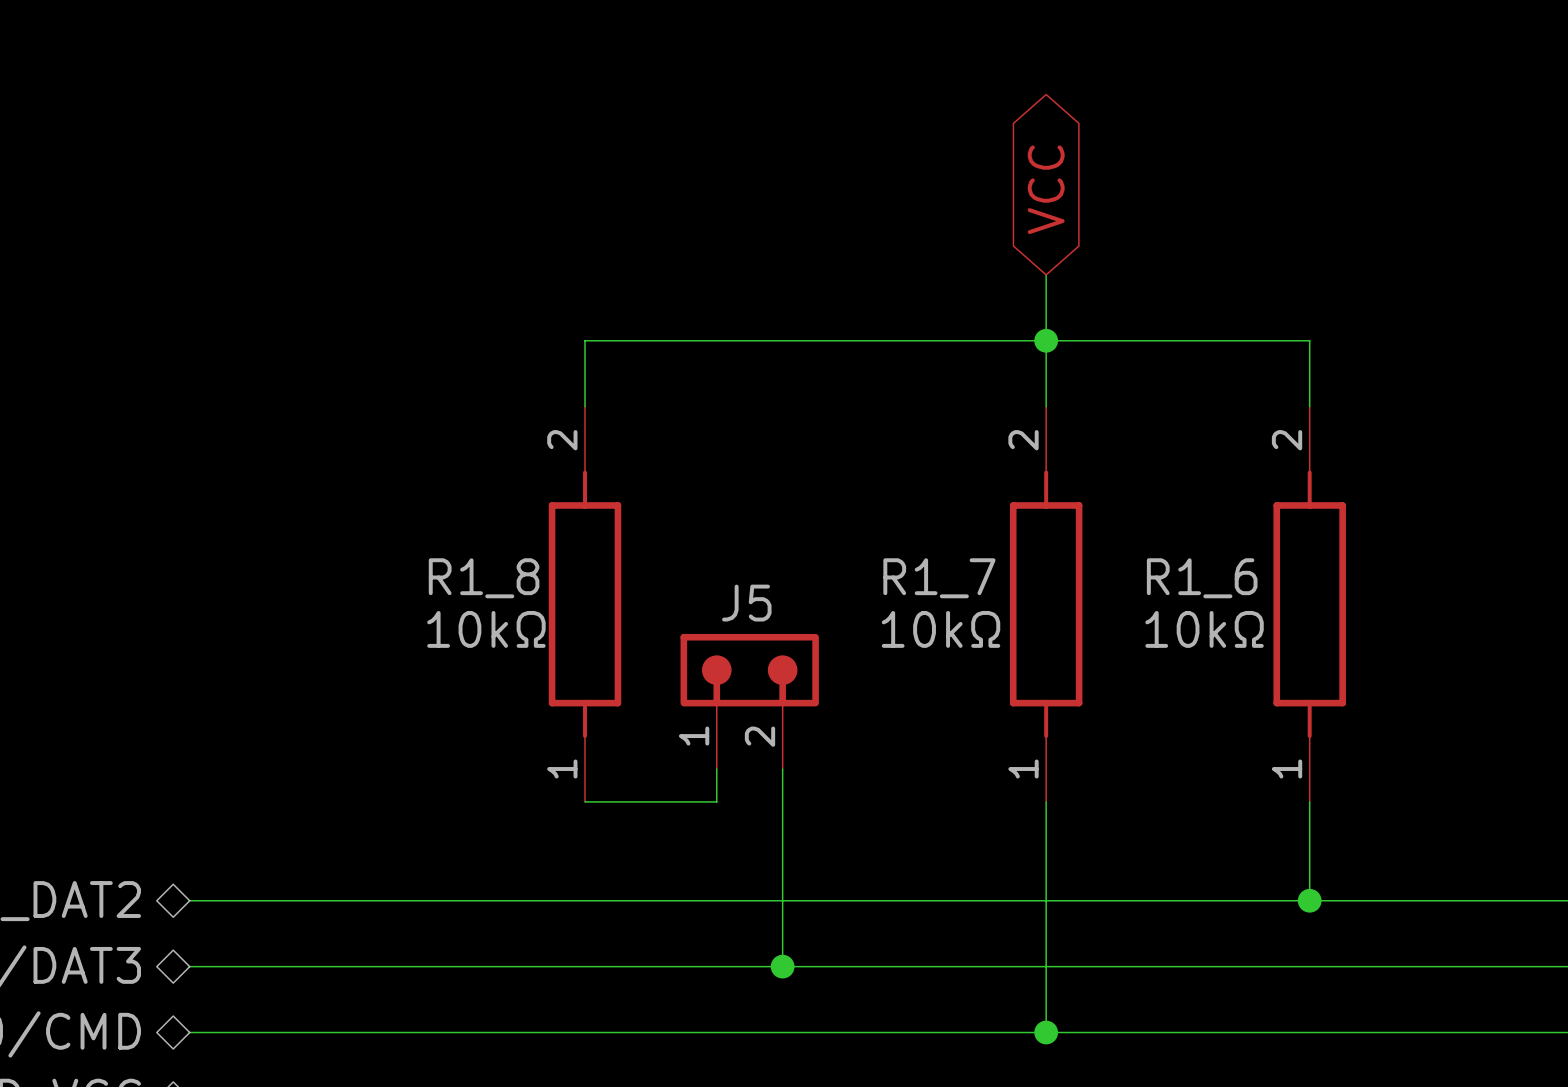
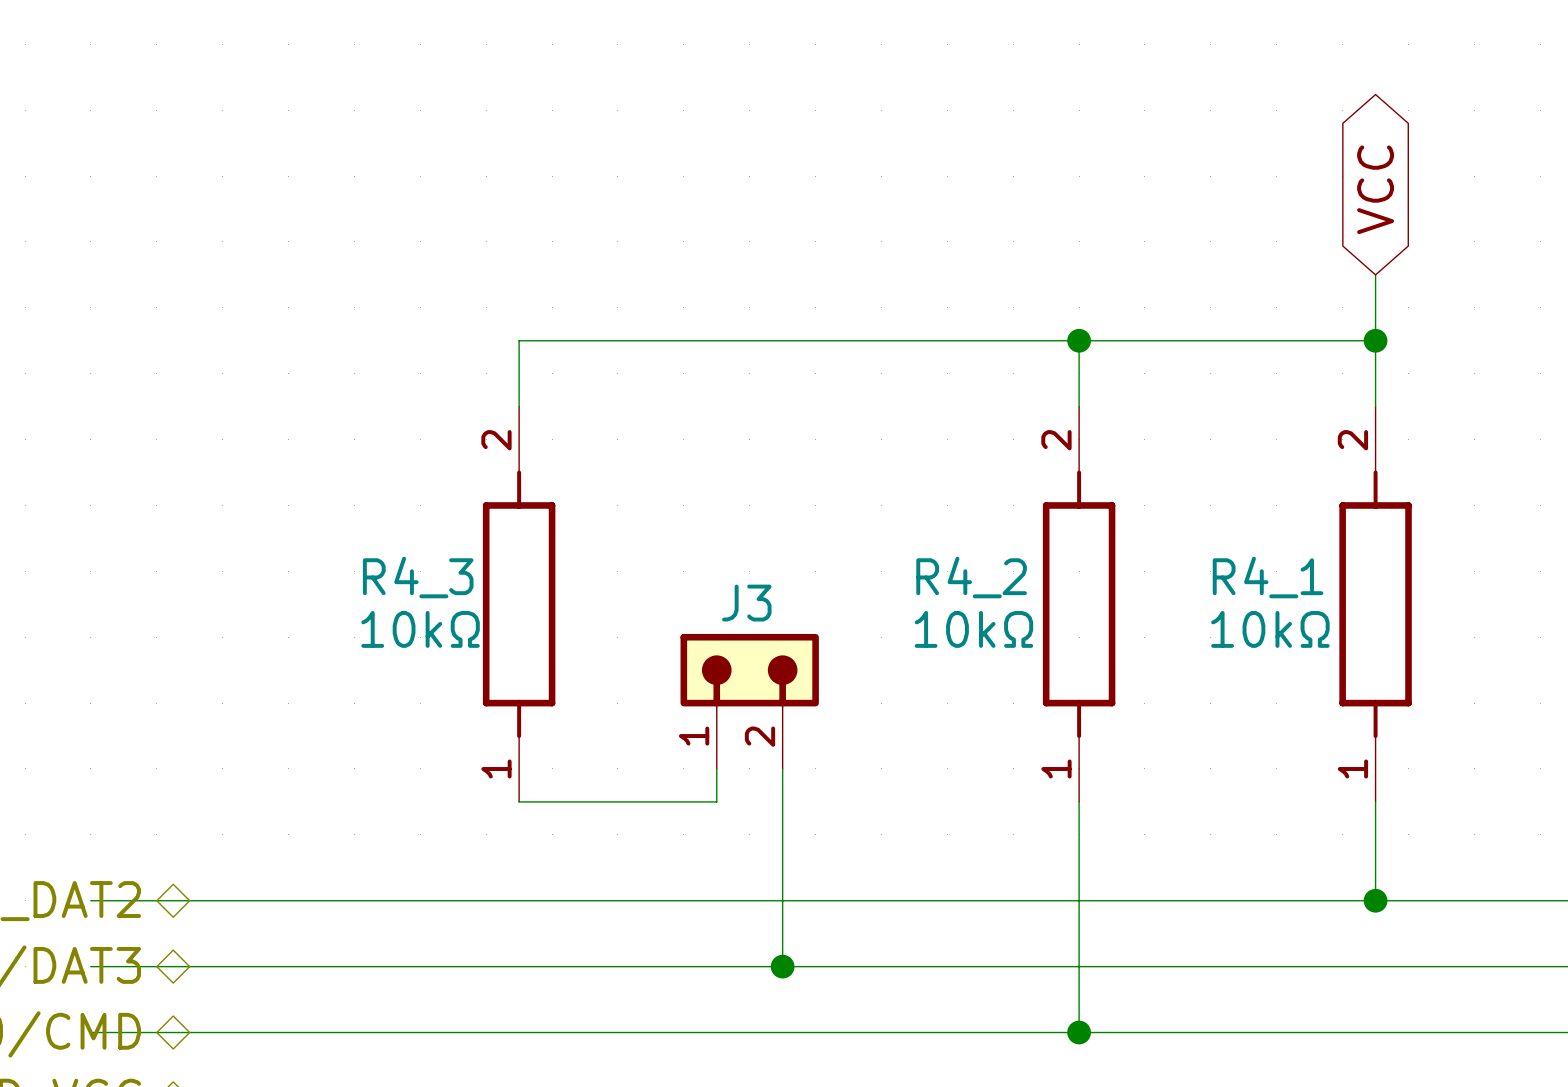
global label position: VCC (1046, 189) -> VCC (1375, 189)
wire: (1046, 274) (1046, 406) -> (1375, 274) (1375, 406)
wire: (585, 340) (585, 406) -> (585, 340) (519, 340) (519, 406)
junction position: (1046, 340) -> (1079, 340)
wire: none -> (1079, 340) (1079, 406)
wire: (1309, 340) (1309, 406) -> (1309, 340) (1375, 340)
junction: none -> (1375, 340)
J5 name: J5 (746, 603) -> J3 (746, 603)
R4_3: none -> 10kΩ (519, 604)
R1_8: 10kΩ (585, 604) -> none
R1_7: 10kΩ (1046, 604) -> none
R4_2: none -> 10kΩ (1079, 604)
R1_6: 10kΩ (1309, 604) -> none
R4_1: none -> 10kΩ (1375, 604)
wire: none -> (519, 801) (585, 801)
wire: (1046, 801) (1046, 1032) -> (1079, 801) (1079, 1032)
wire: (1309, 801) (1309, 900) -> (1375, 801) (1375, 900)
wire: none -> (90, 900) (189, 900)
junction position: (1309, 900) -> (1375, 900)
wire: none -> (90, 966) (189, 966)
wire: none -> (90, 1032) (189, 1032)
junction position: (1046, 1032) -> (1079, 1032)

